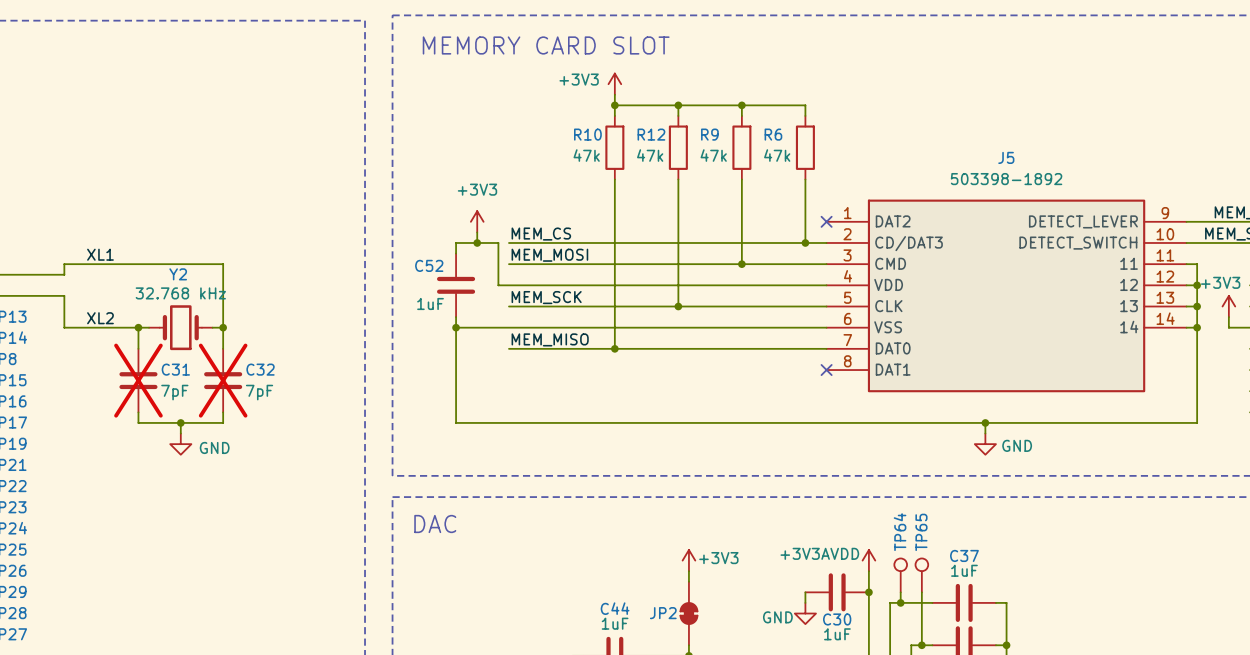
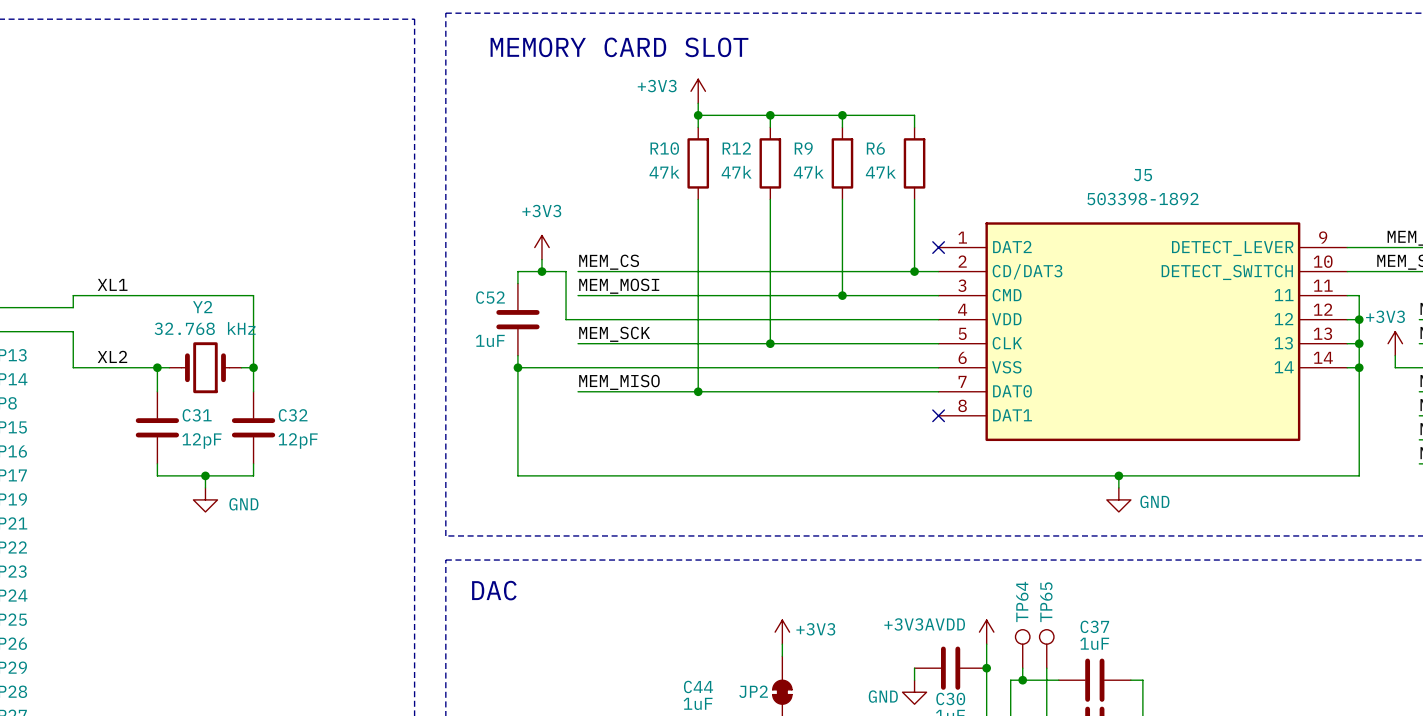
C31 do-not-place cross: (138, 380) -> none
C32 do-not-place cross: (223, 380) -> none
C31 value: 7pF (174, 392) -> 12pF (201, 441)
C32 value: 7pF (259, 392) -> 12pF (298, 441)

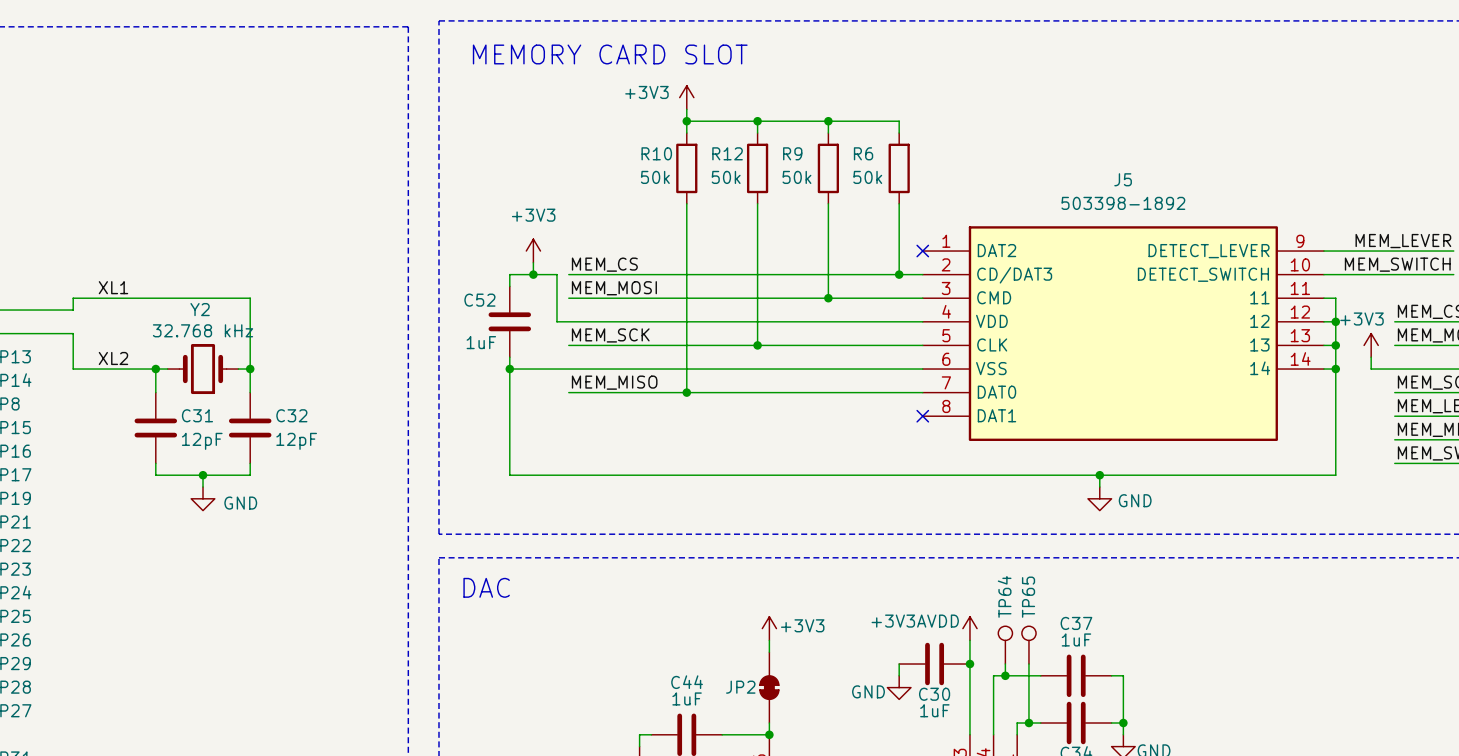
R10 value: 47k (664, 172) -> 50k (655, 177)
R12 value: 47k (736, 172) -> 50k (726, 177)
R9 value: 47k (808, 172) -> 50k (796, 177)
R6 value: 47k (880, 172) -> 50k (867, 177)

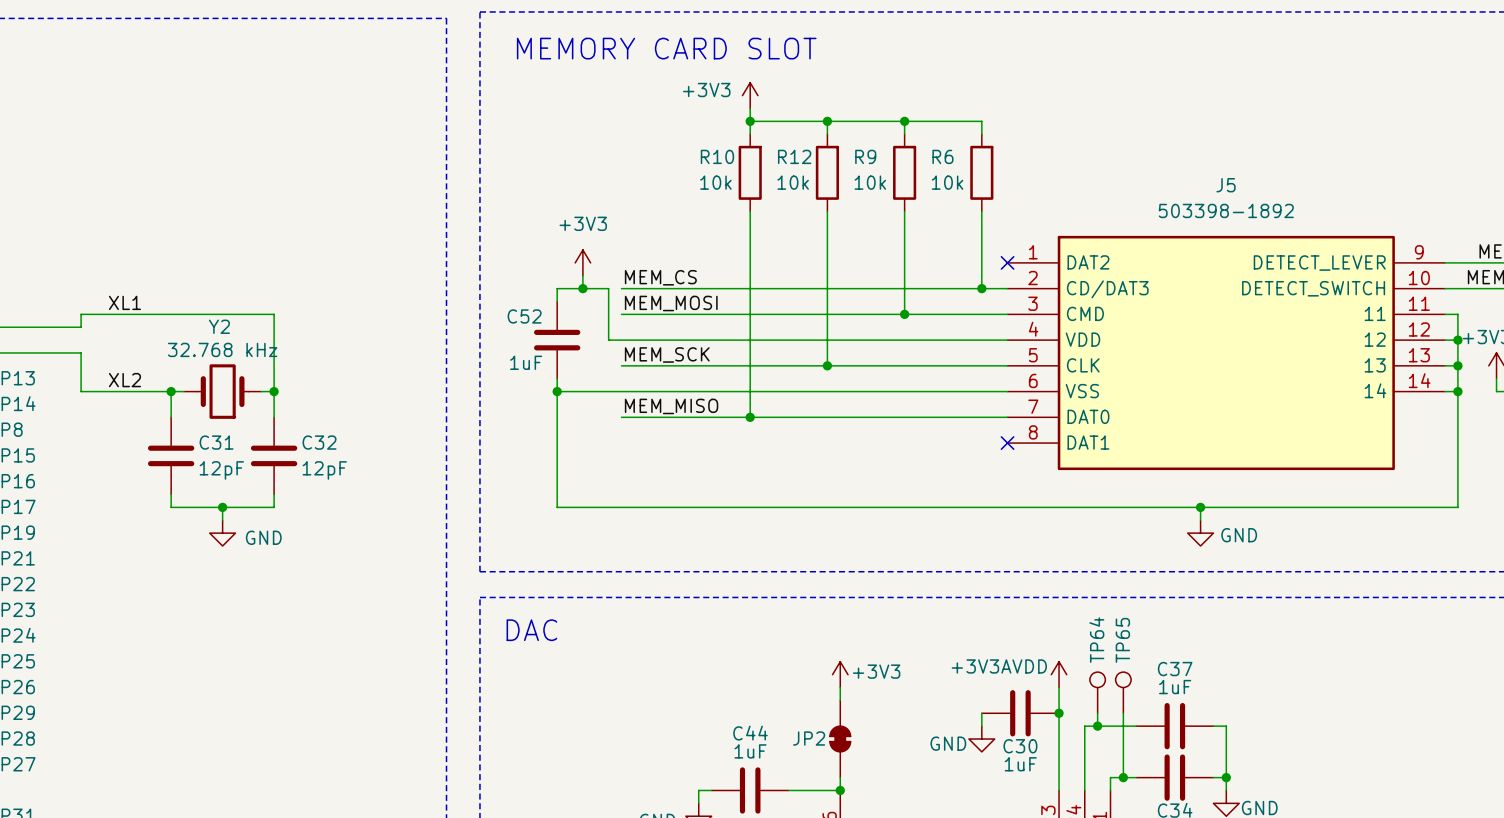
R10 value: 50k (655, 177) -> 10k (715, 182)
R12 value: 50k (726, 177) -> 10k (793, 182)
R9 value: 50k (796, 177) -> 10k (870, 182)
R6 value: 50k (867, 177) -> 10k (947, 182)

